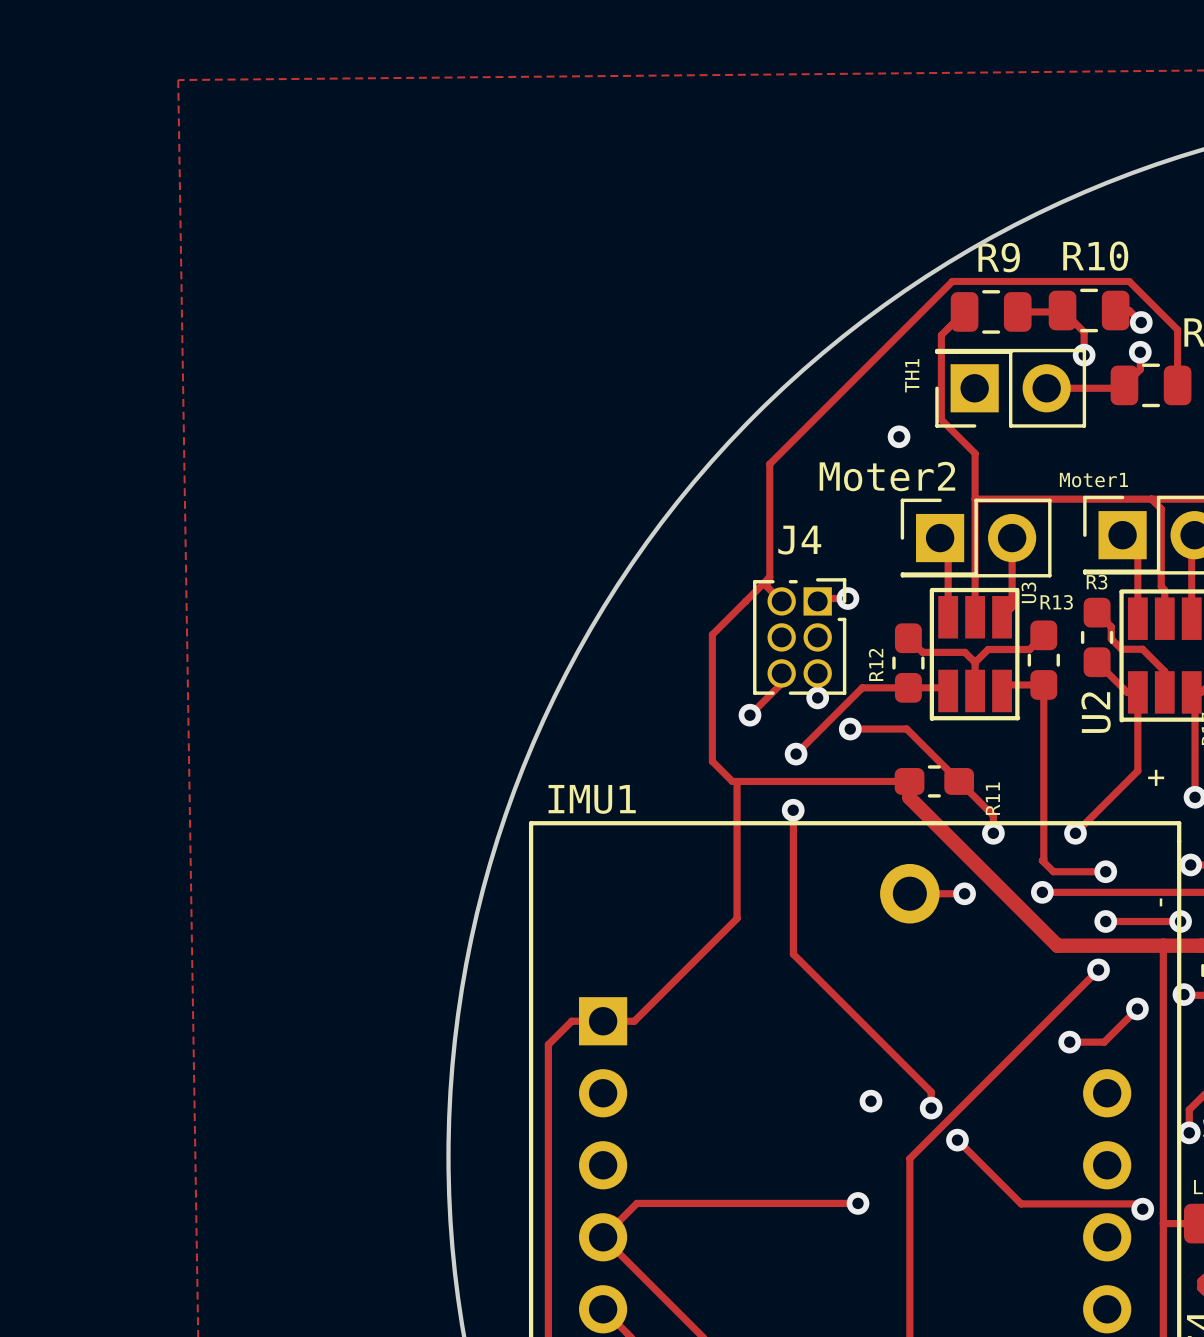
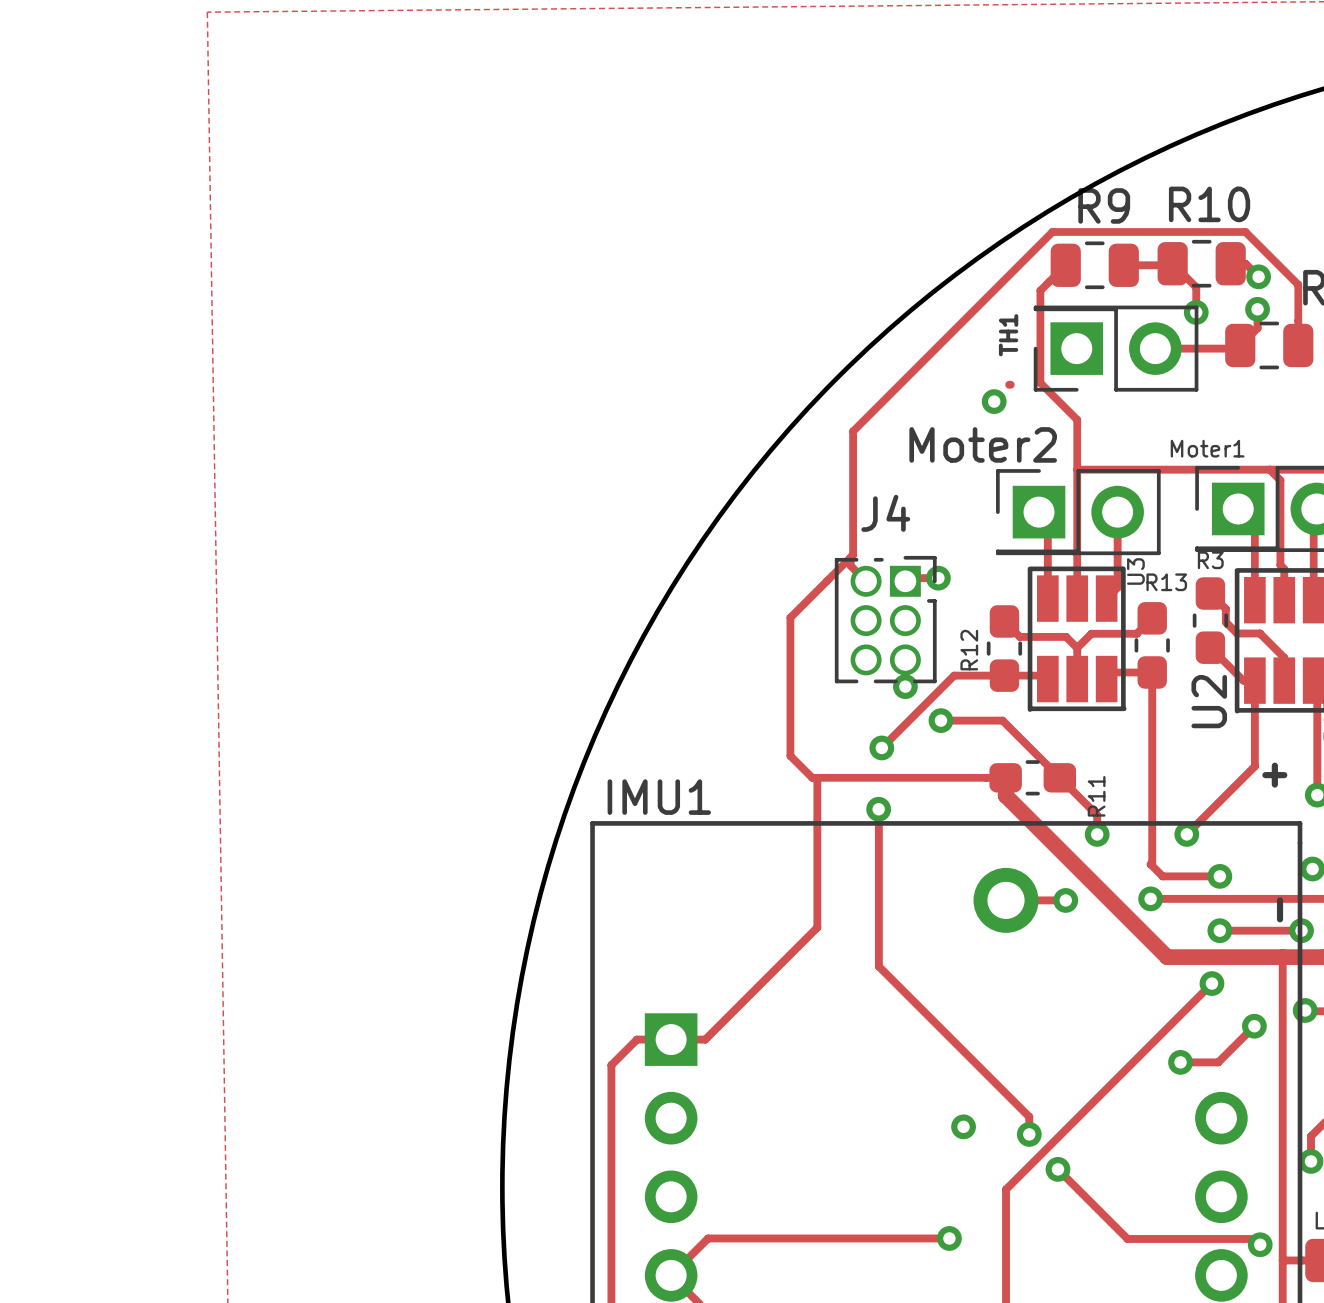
track: none -> (1009, 384) (1010, 384)
track: (781, 673) (781, 683) (750, 715) -> none
via: (750, 715) -> none

